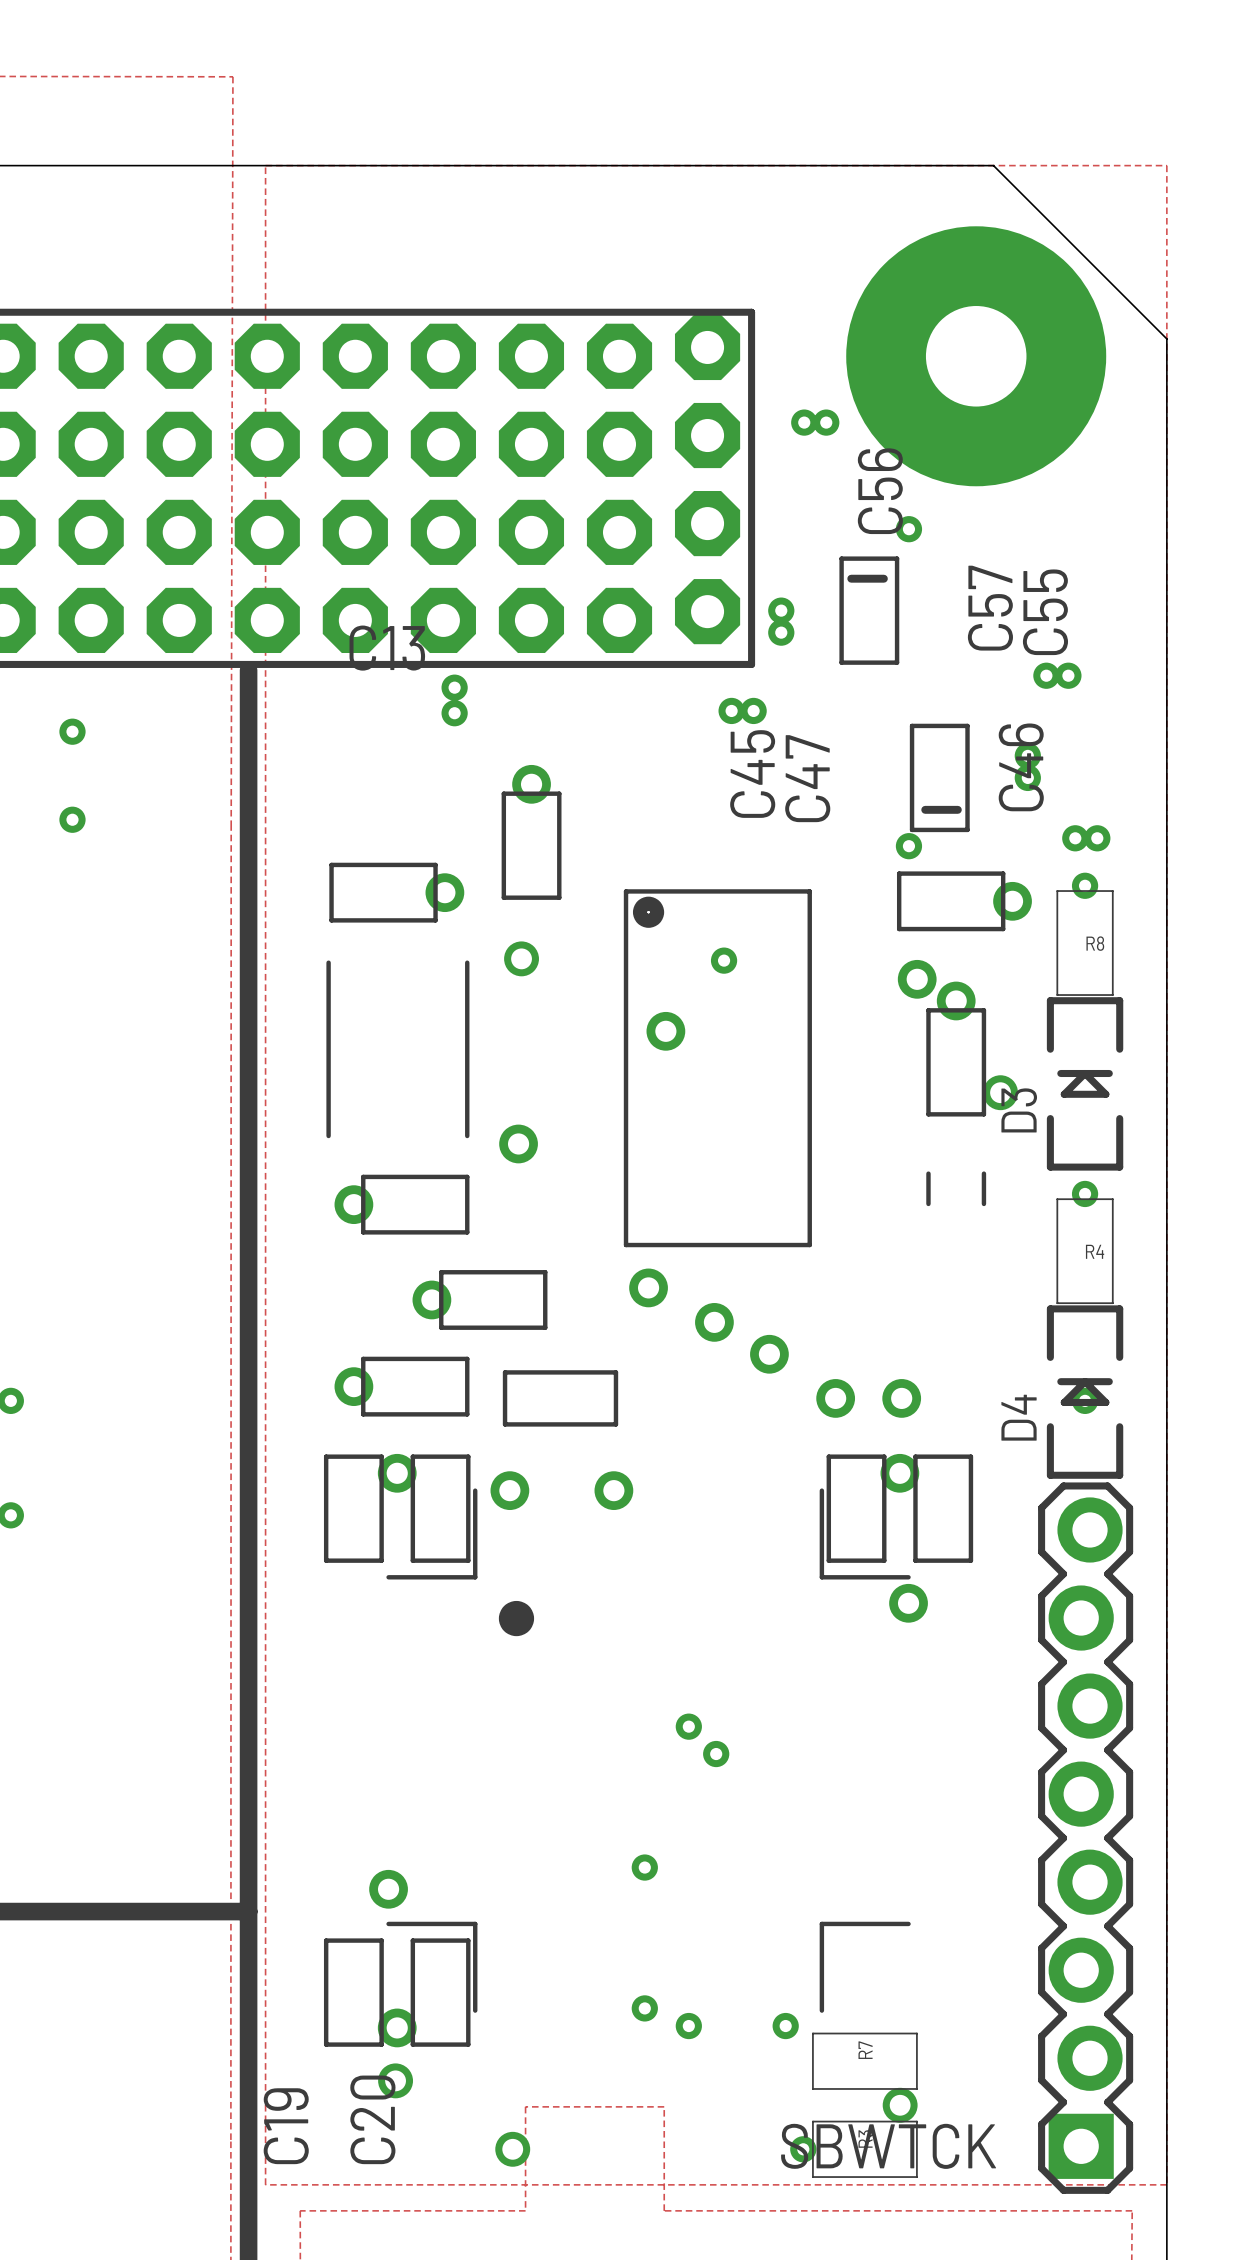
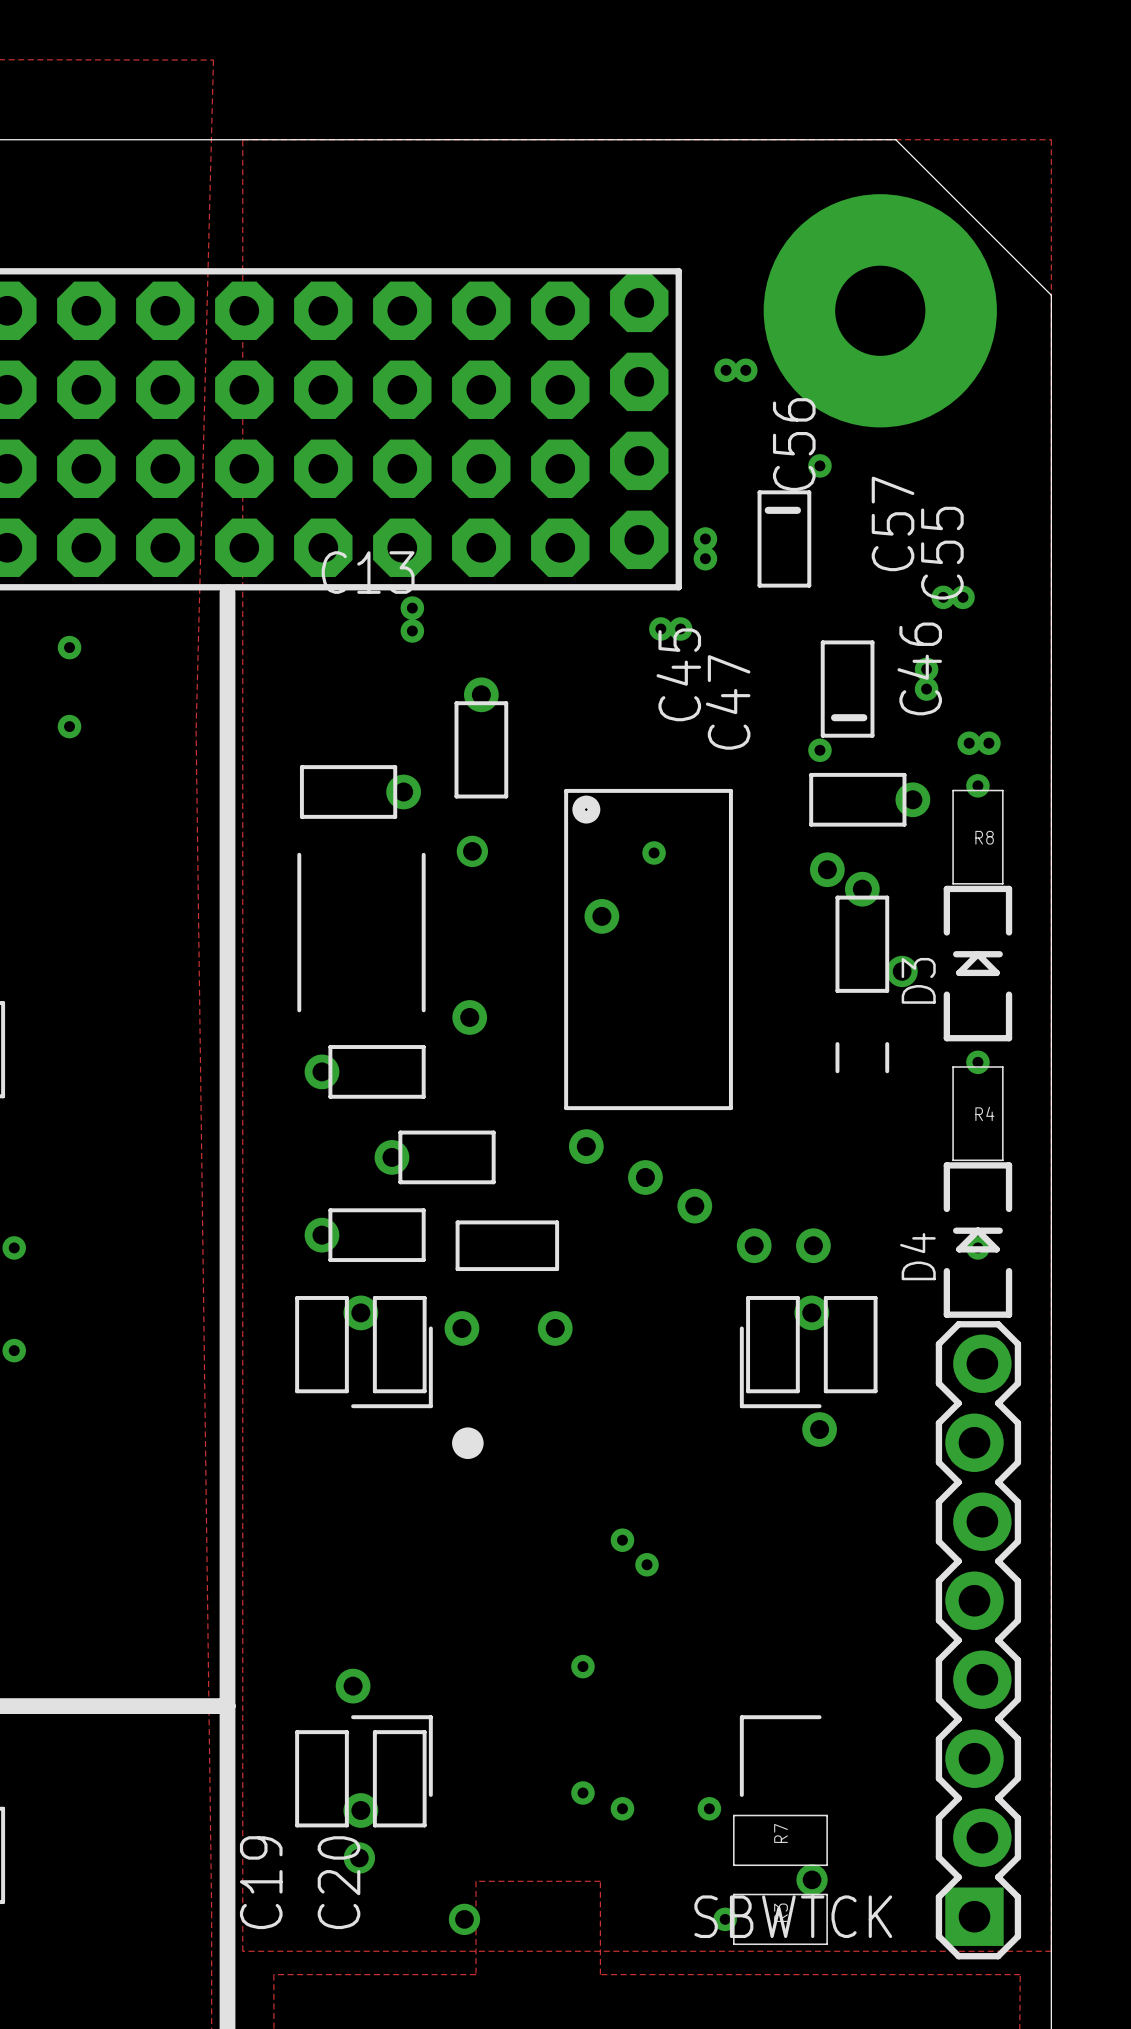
zone outline: (232, 76) (230, 2141) -> (213, 60) (196, 730) (211, 1912)

